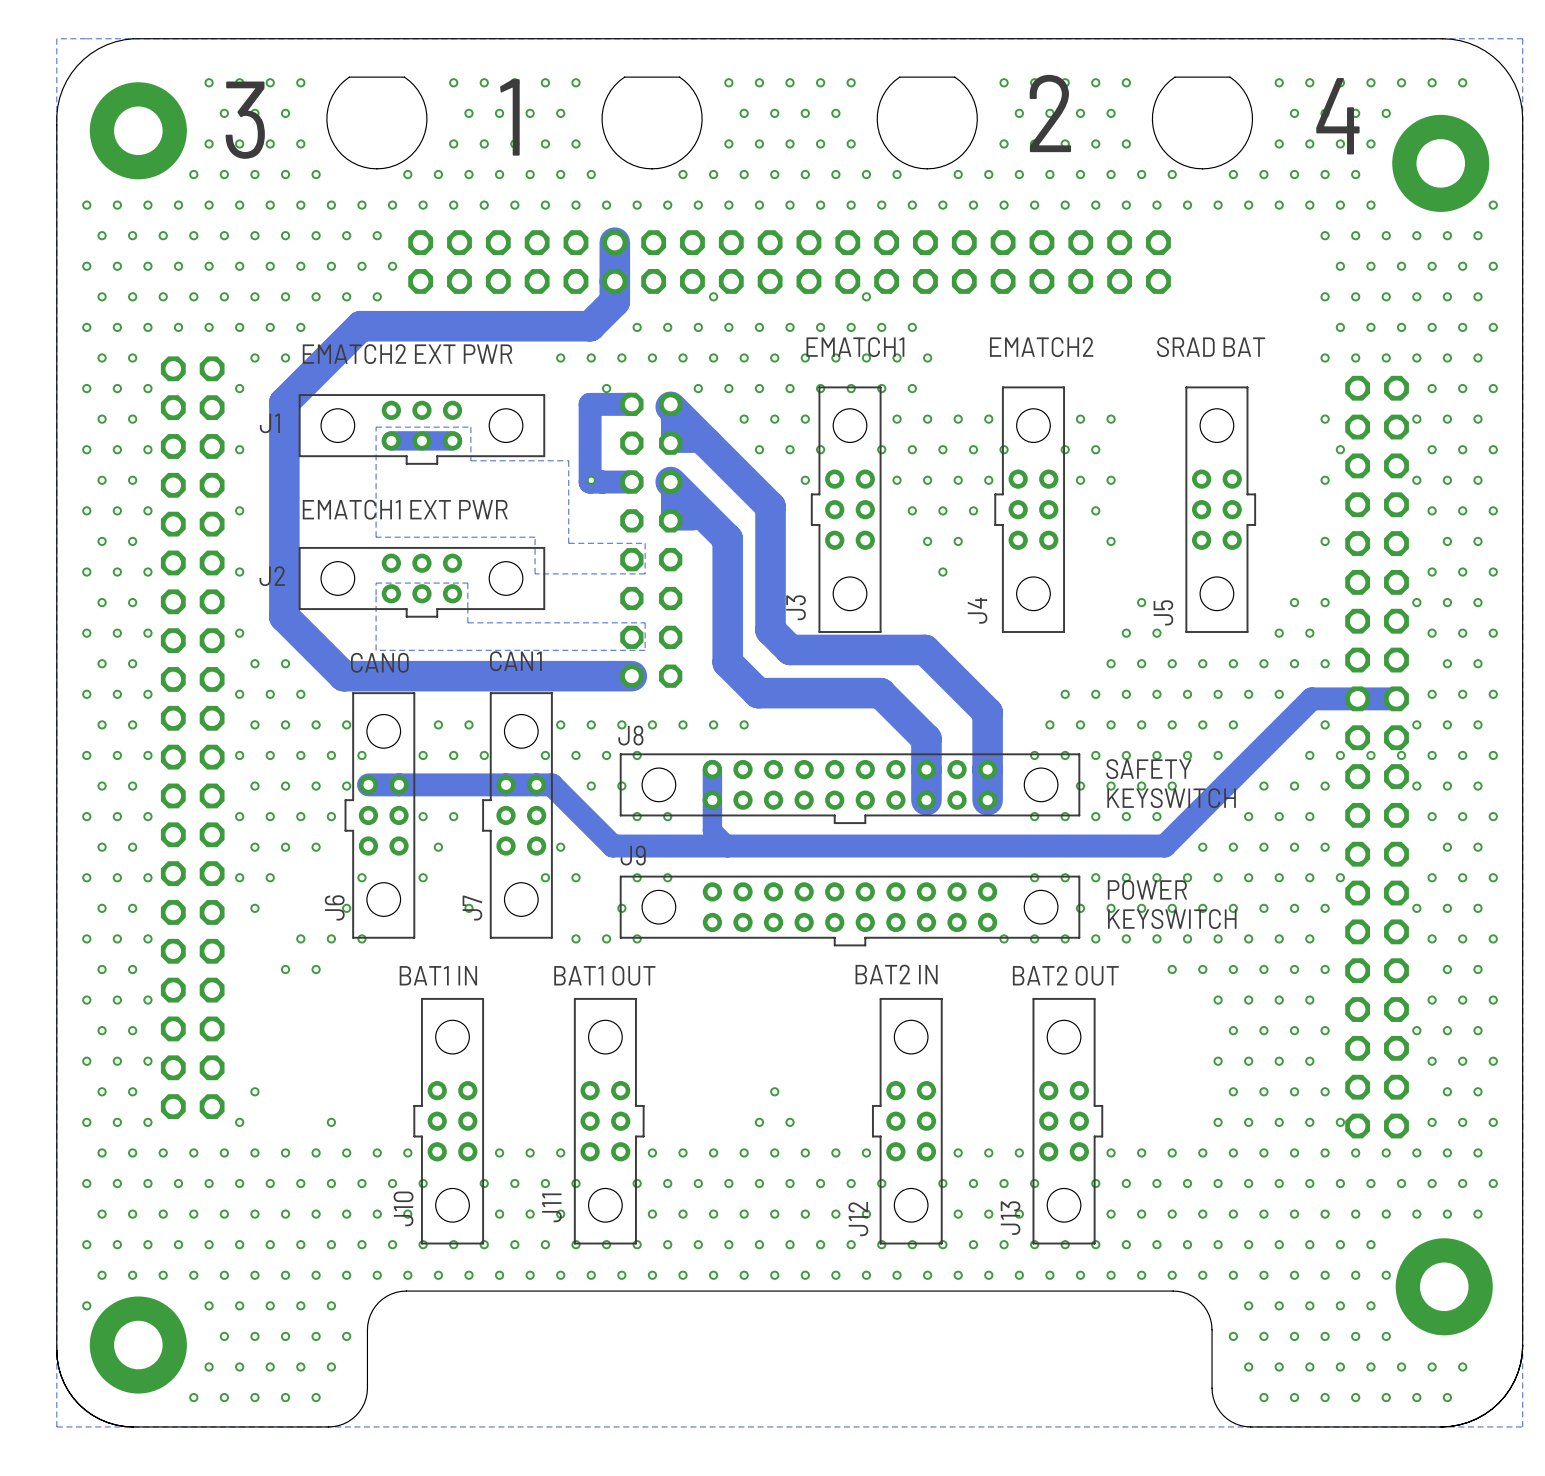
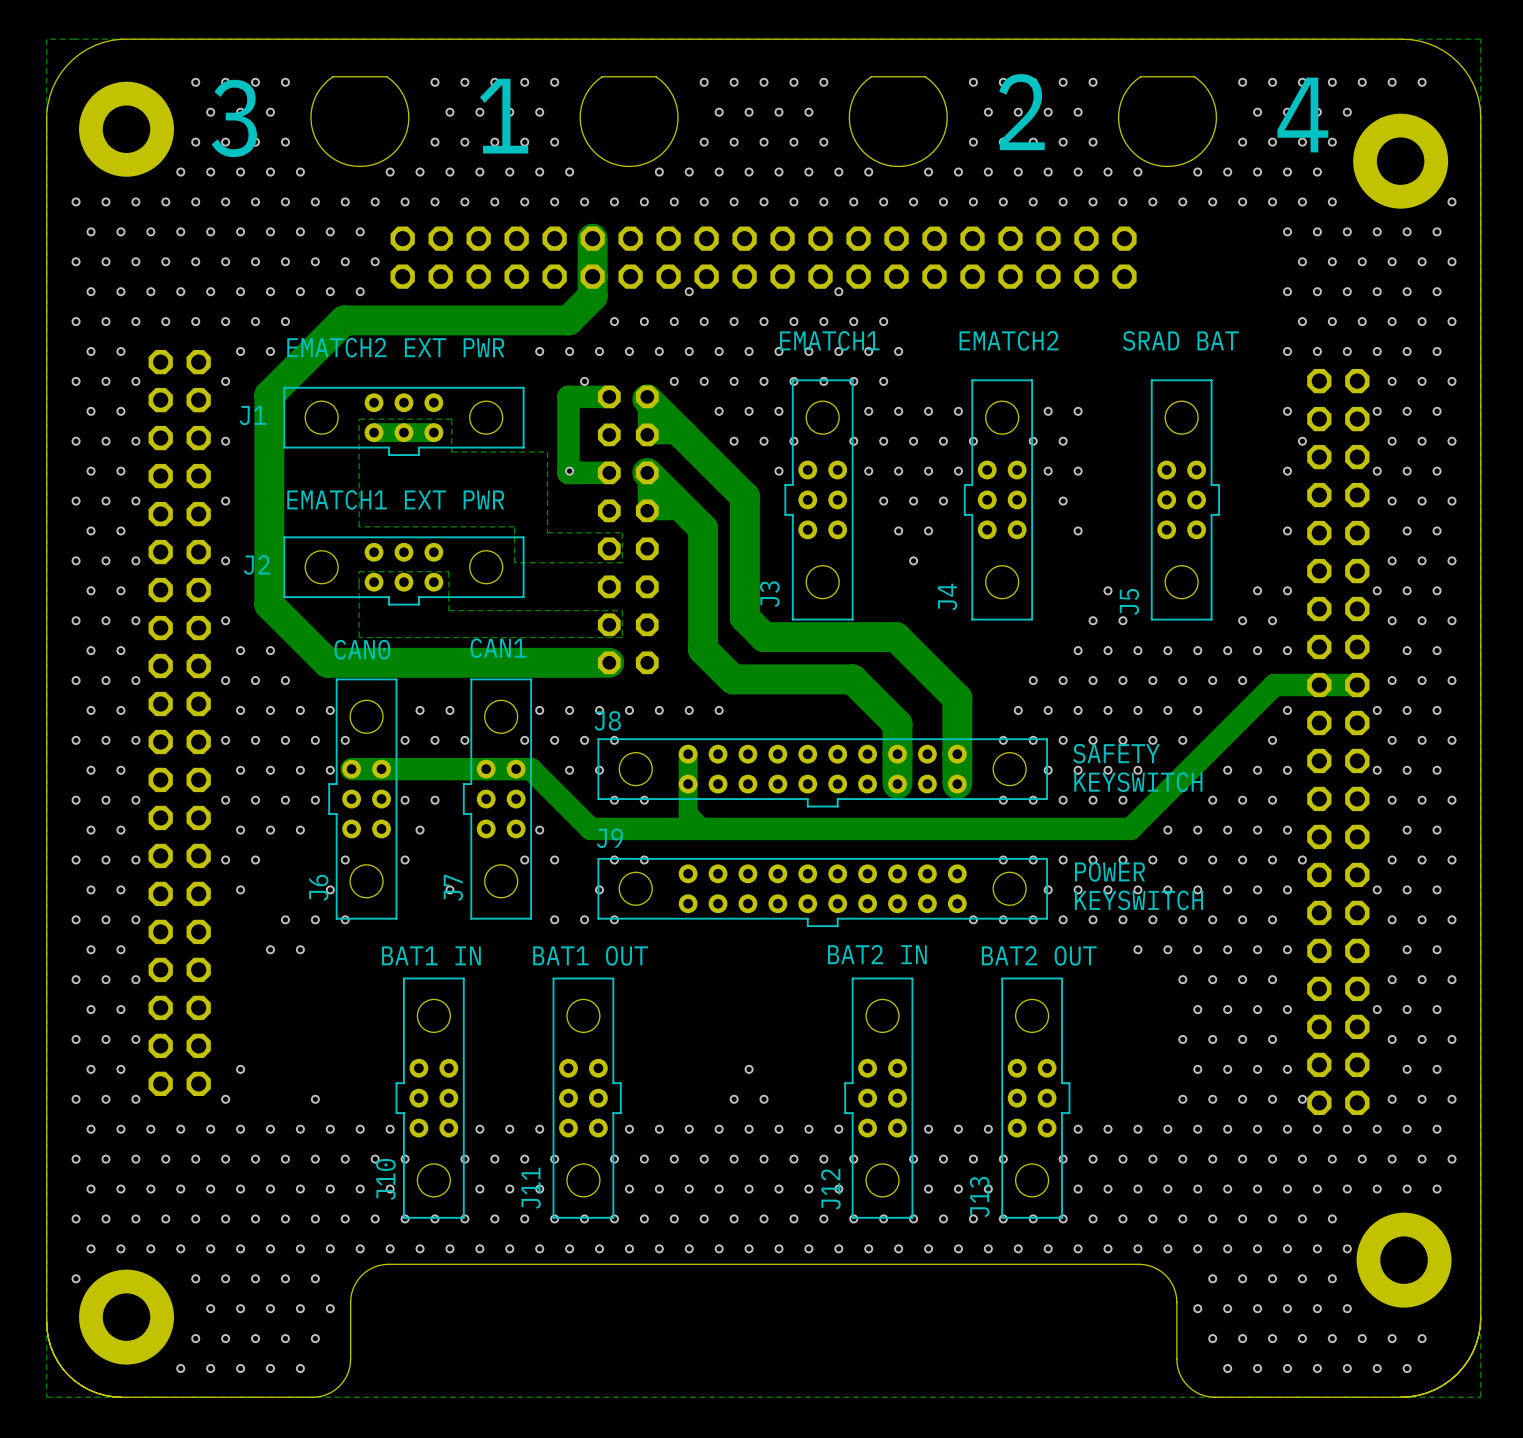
via: (1340, 755) -> none
via: (1370, 755) -> none
via: (1401, 755) -> none

